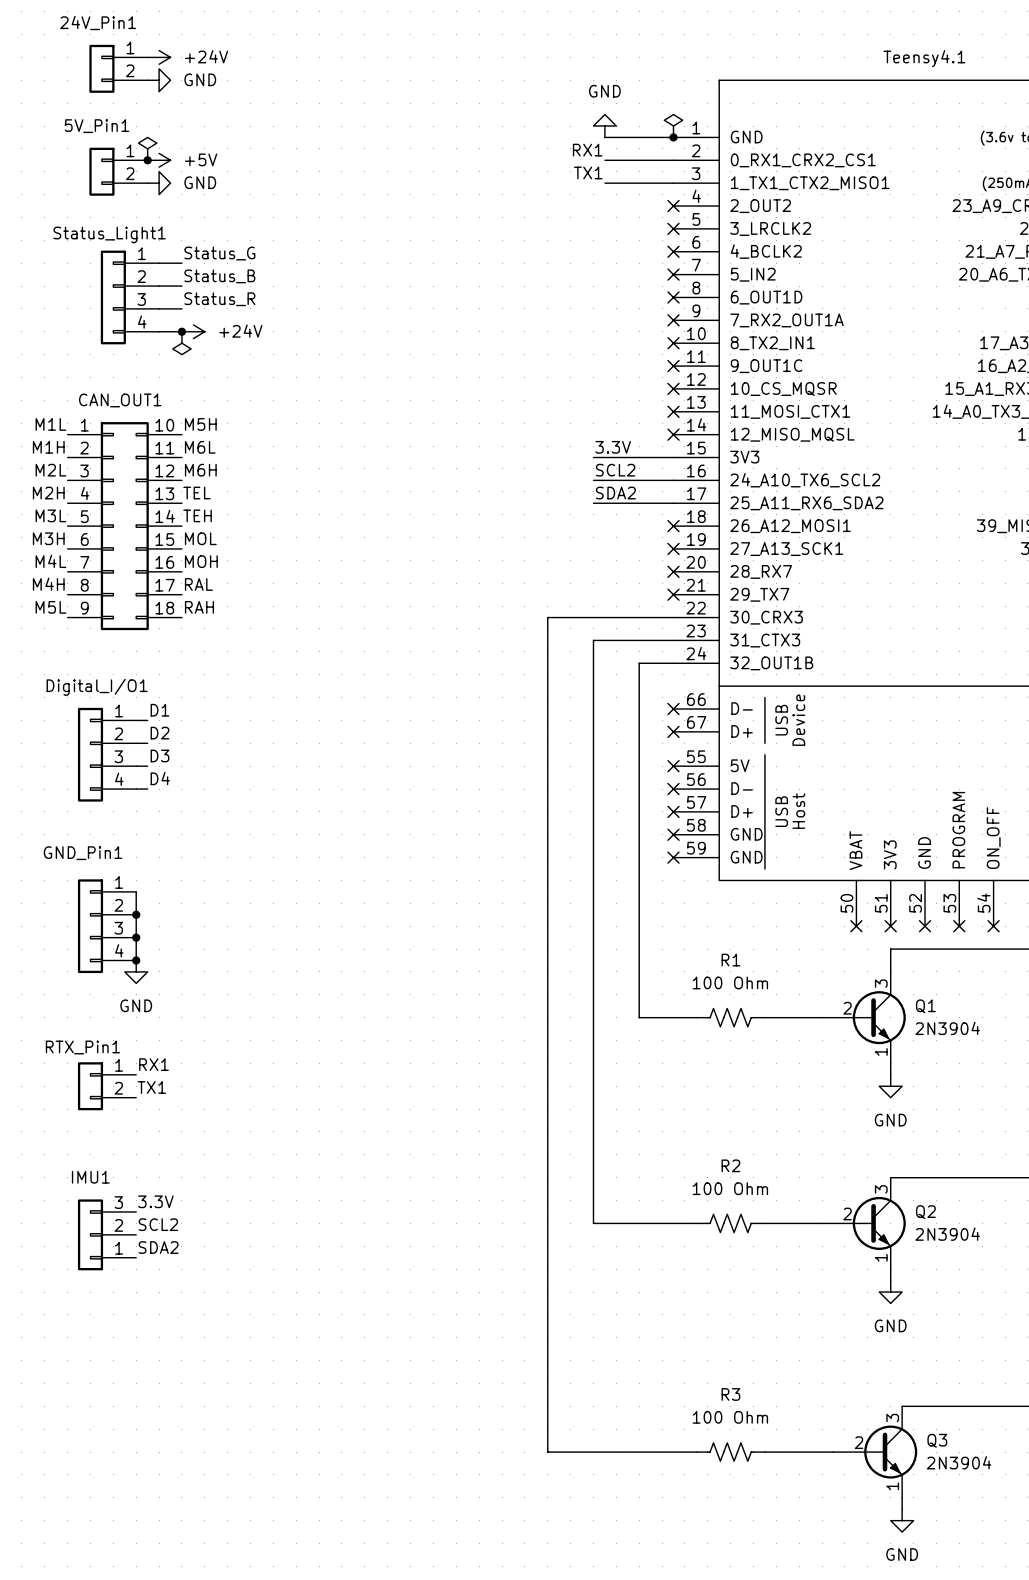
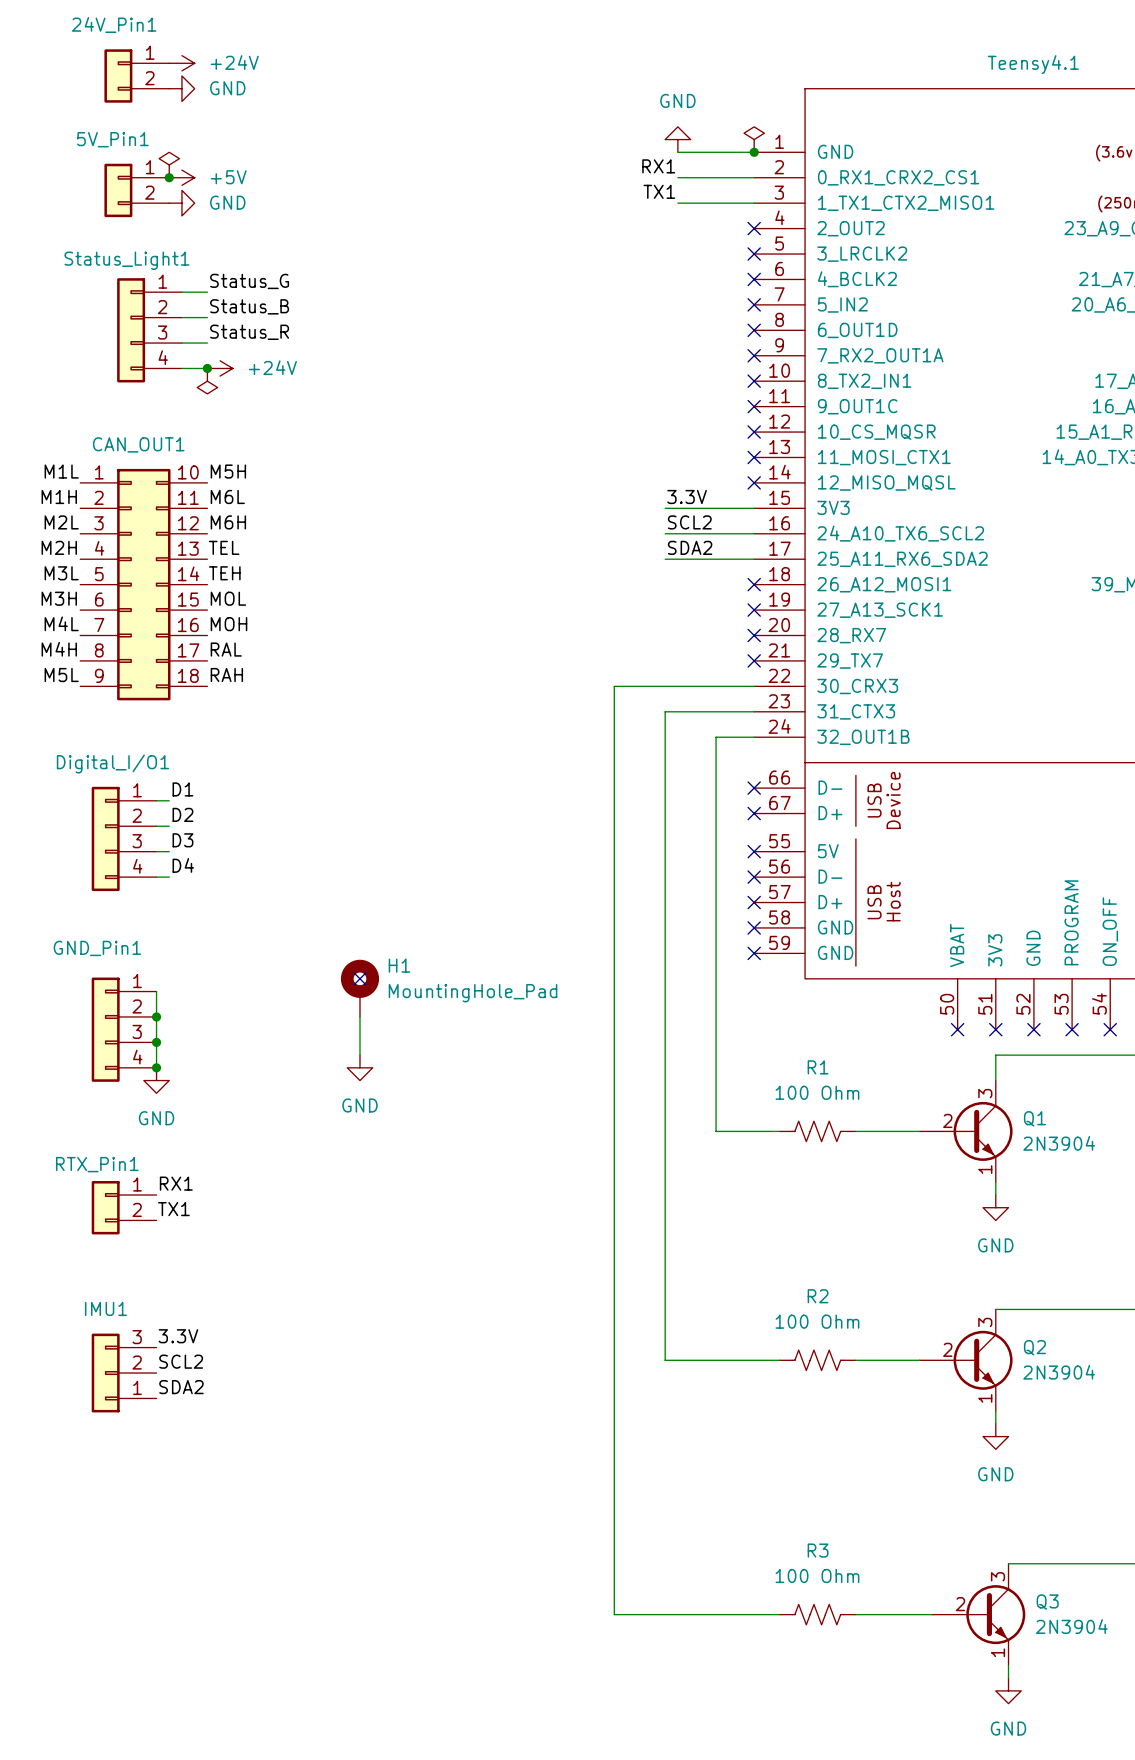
no-connect mark: none -> (359, 978)
H1: none -> MountingHole_Pad (359, 988)
wire: none -> (359, 1016) (359, 1055)
power symbol: none -> GND (359, 1067)

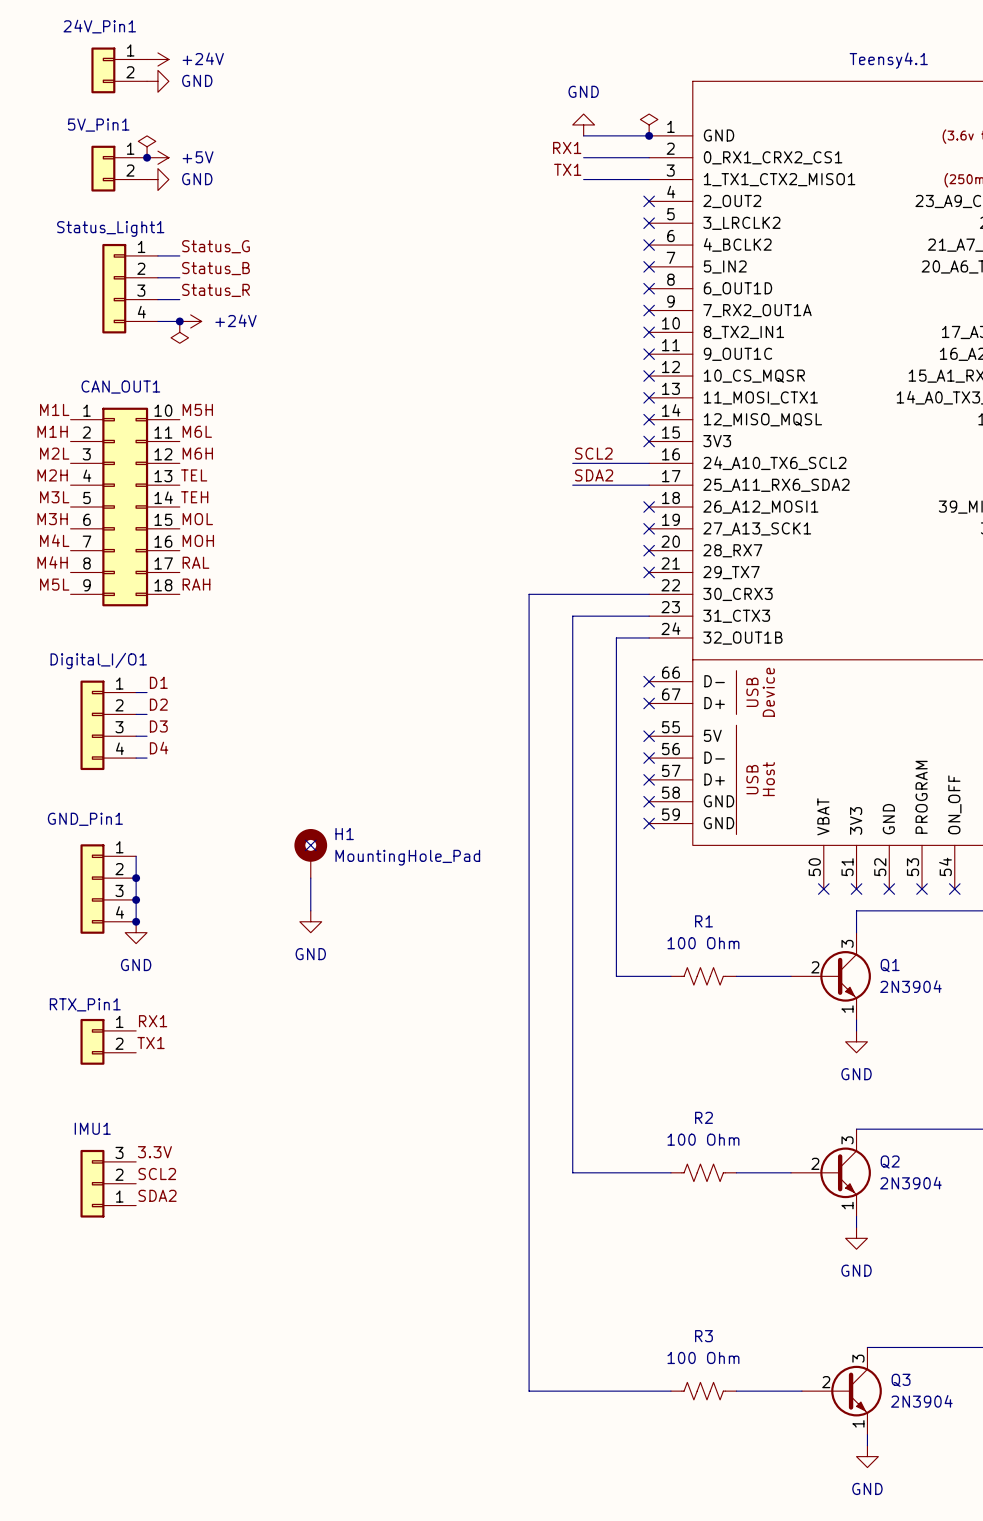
label: 3.3V (687, 496) -> none
wire: (665, 508) (754, 508) -> none
no-connect mark: none -> (649, 441)

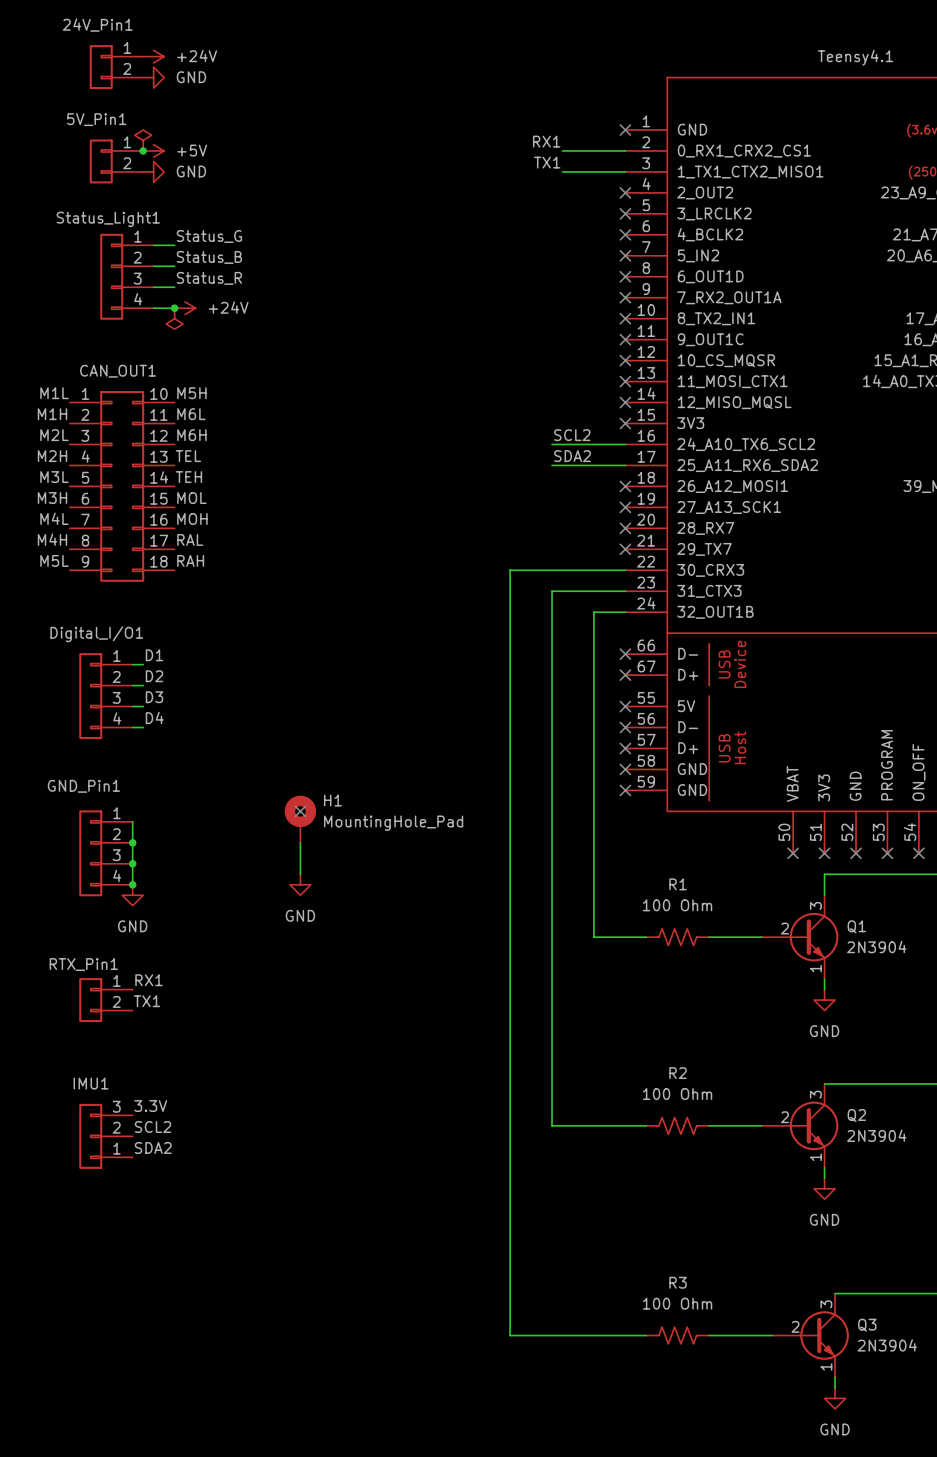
power symbol: GND (583, 124) -> none
power symbol: (649, 124) -> none
wire: (583, 135) (649, 135) -> none
junction: (649, 135) -> none
no-connect mark: none -> (625, 130)

